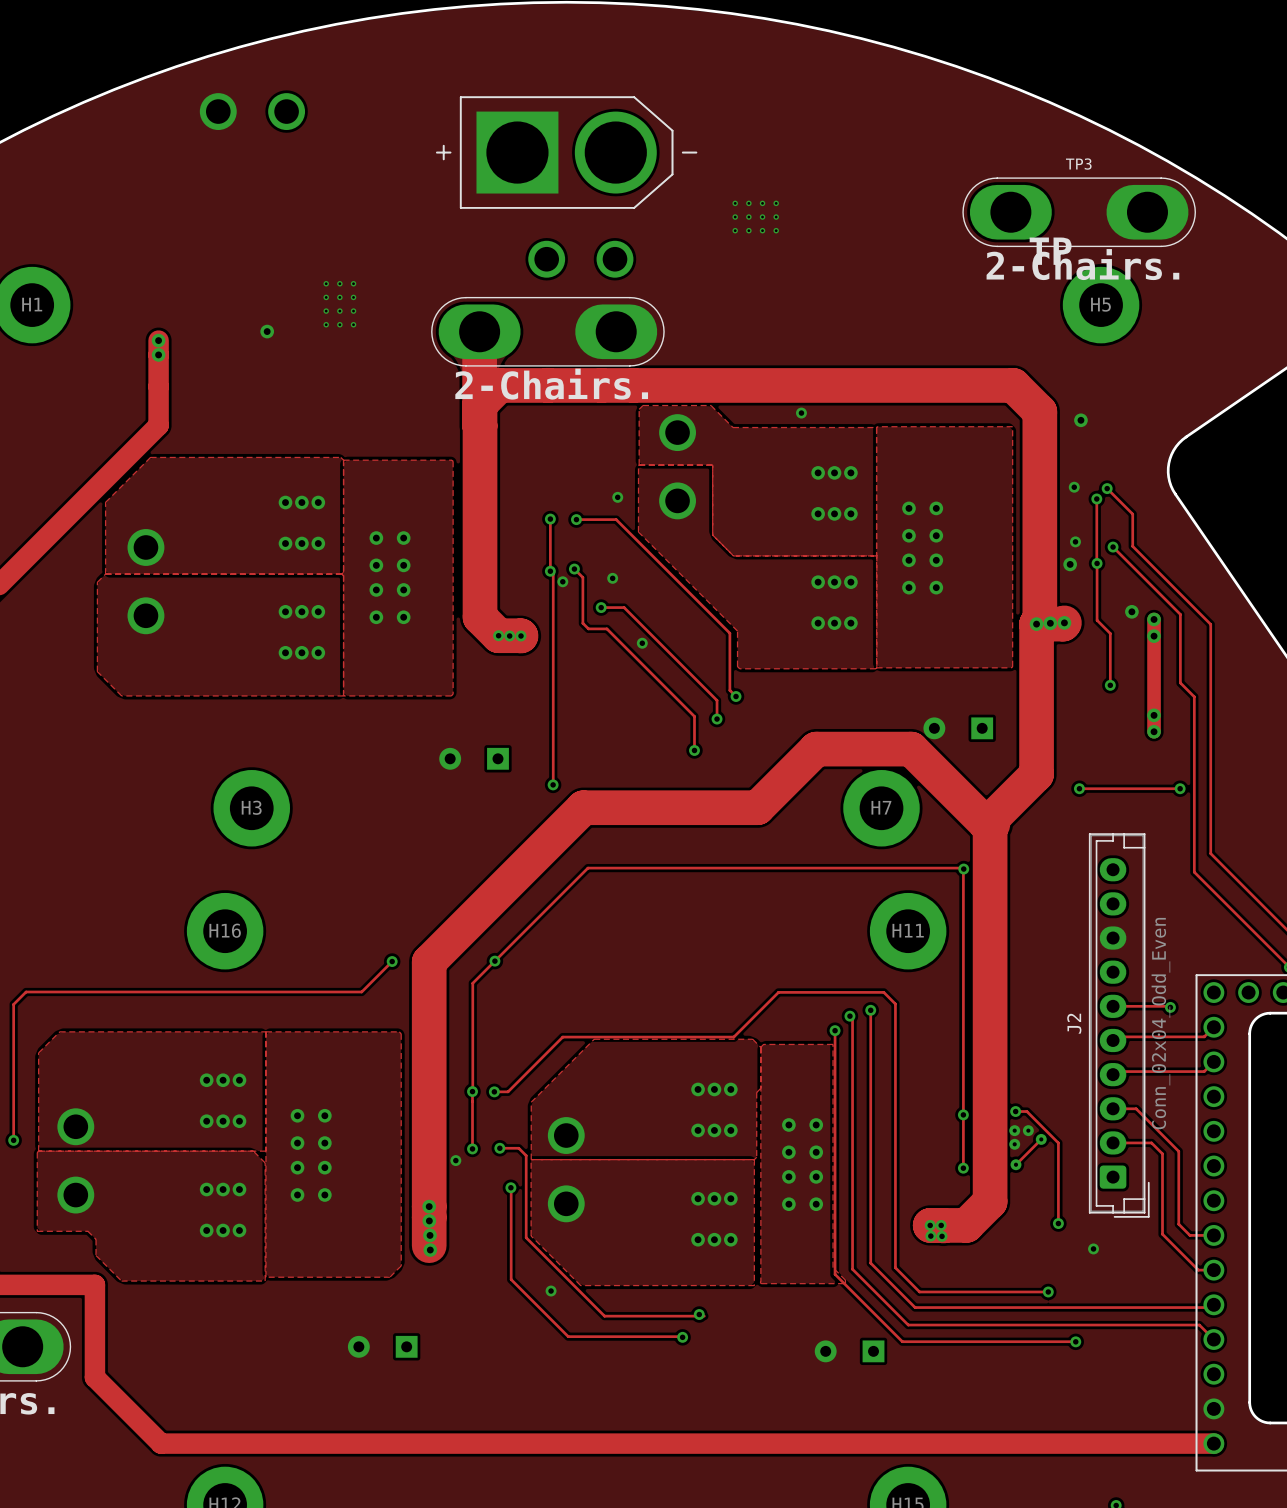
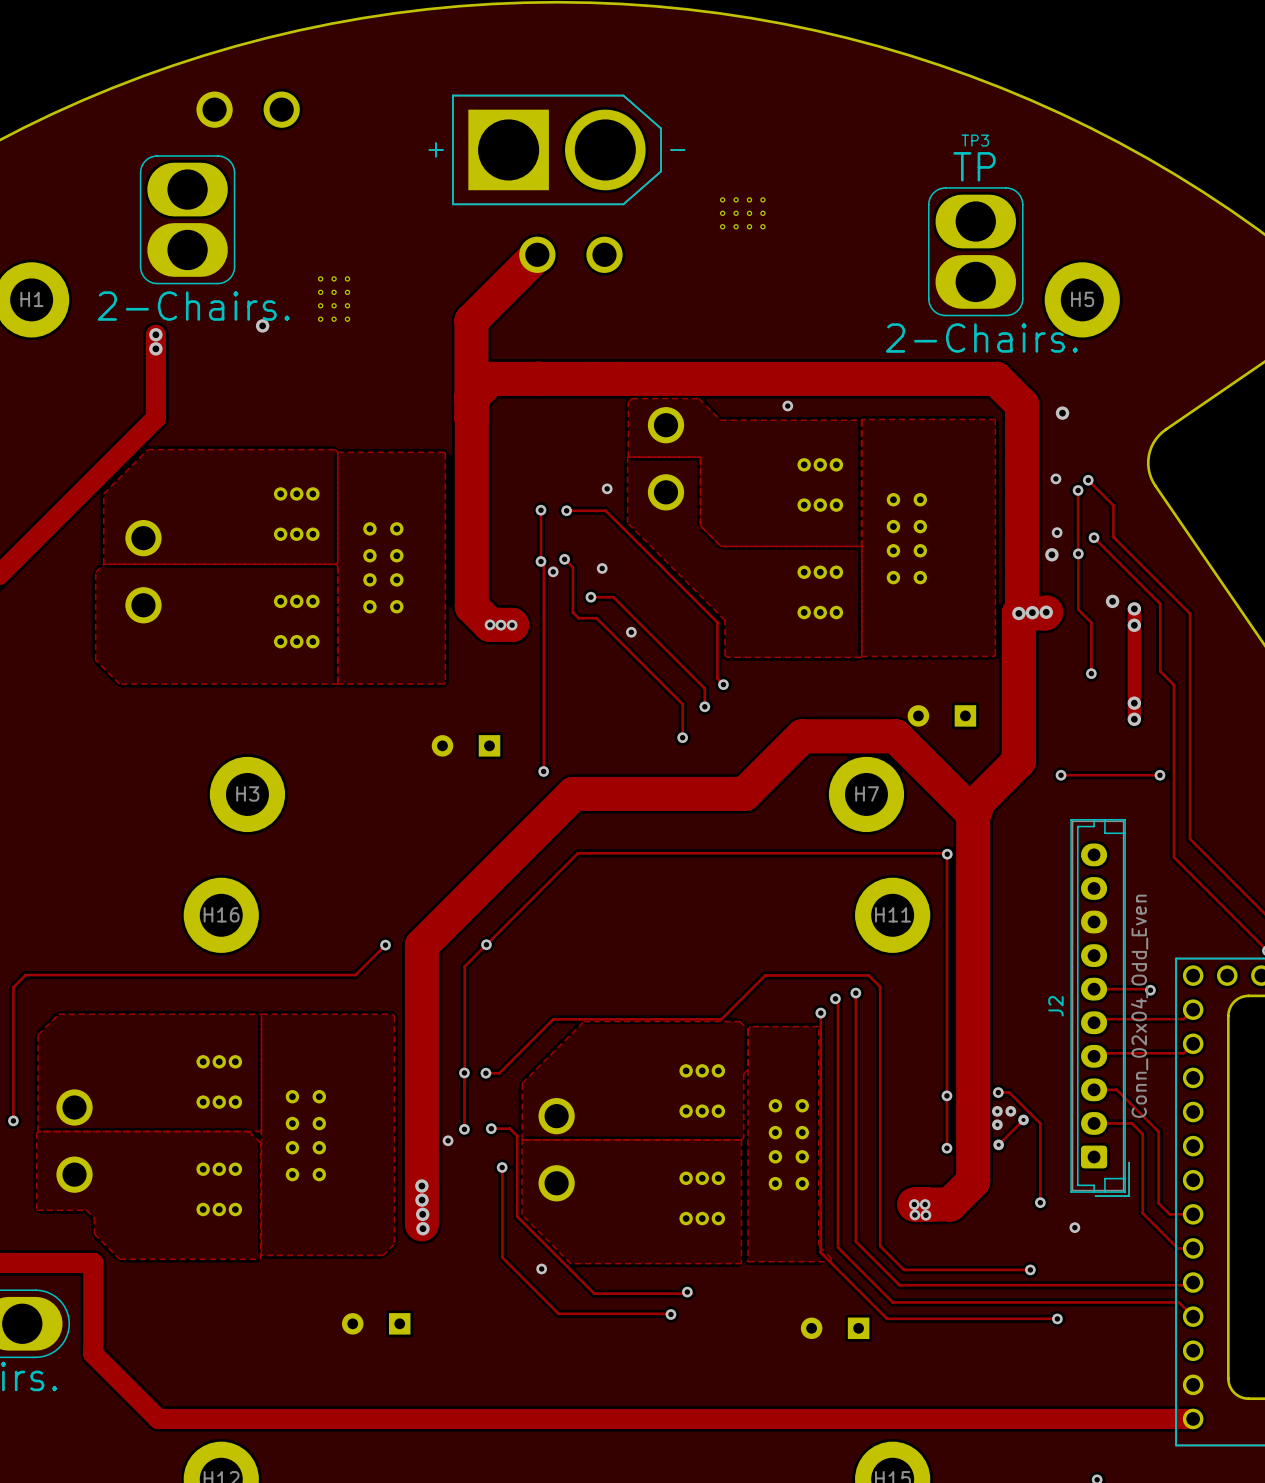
TP3 name position: TP3 (1078, 164) -> TP3 (975, 140)
TP3 footprint: [962, 177, 1196, 248] -> [928, 187, 1024, 317]
part: none -> (187, 219)
track: none -> (537, 254) (471, 320) (471, 326)
part: (547, 331) -> none

